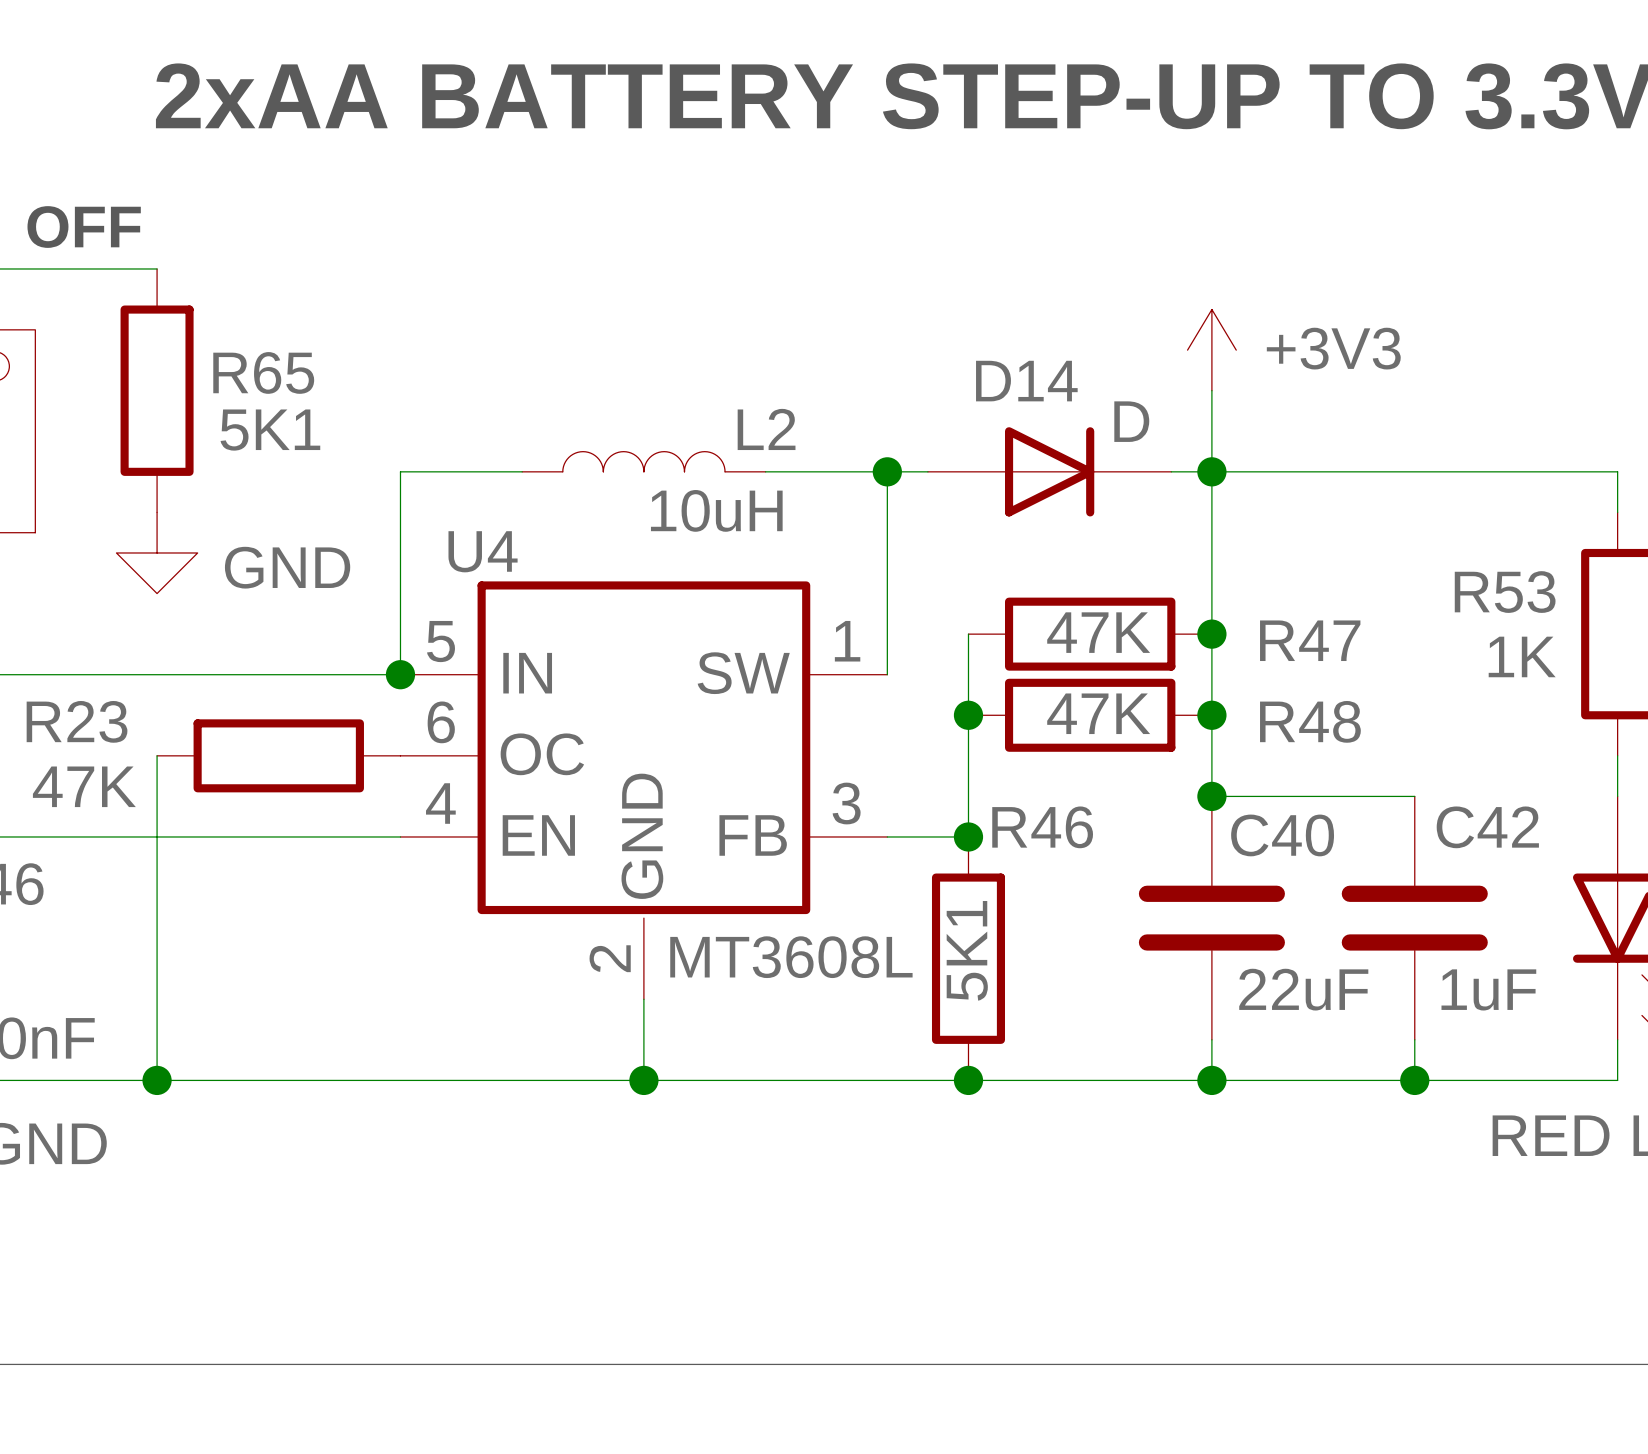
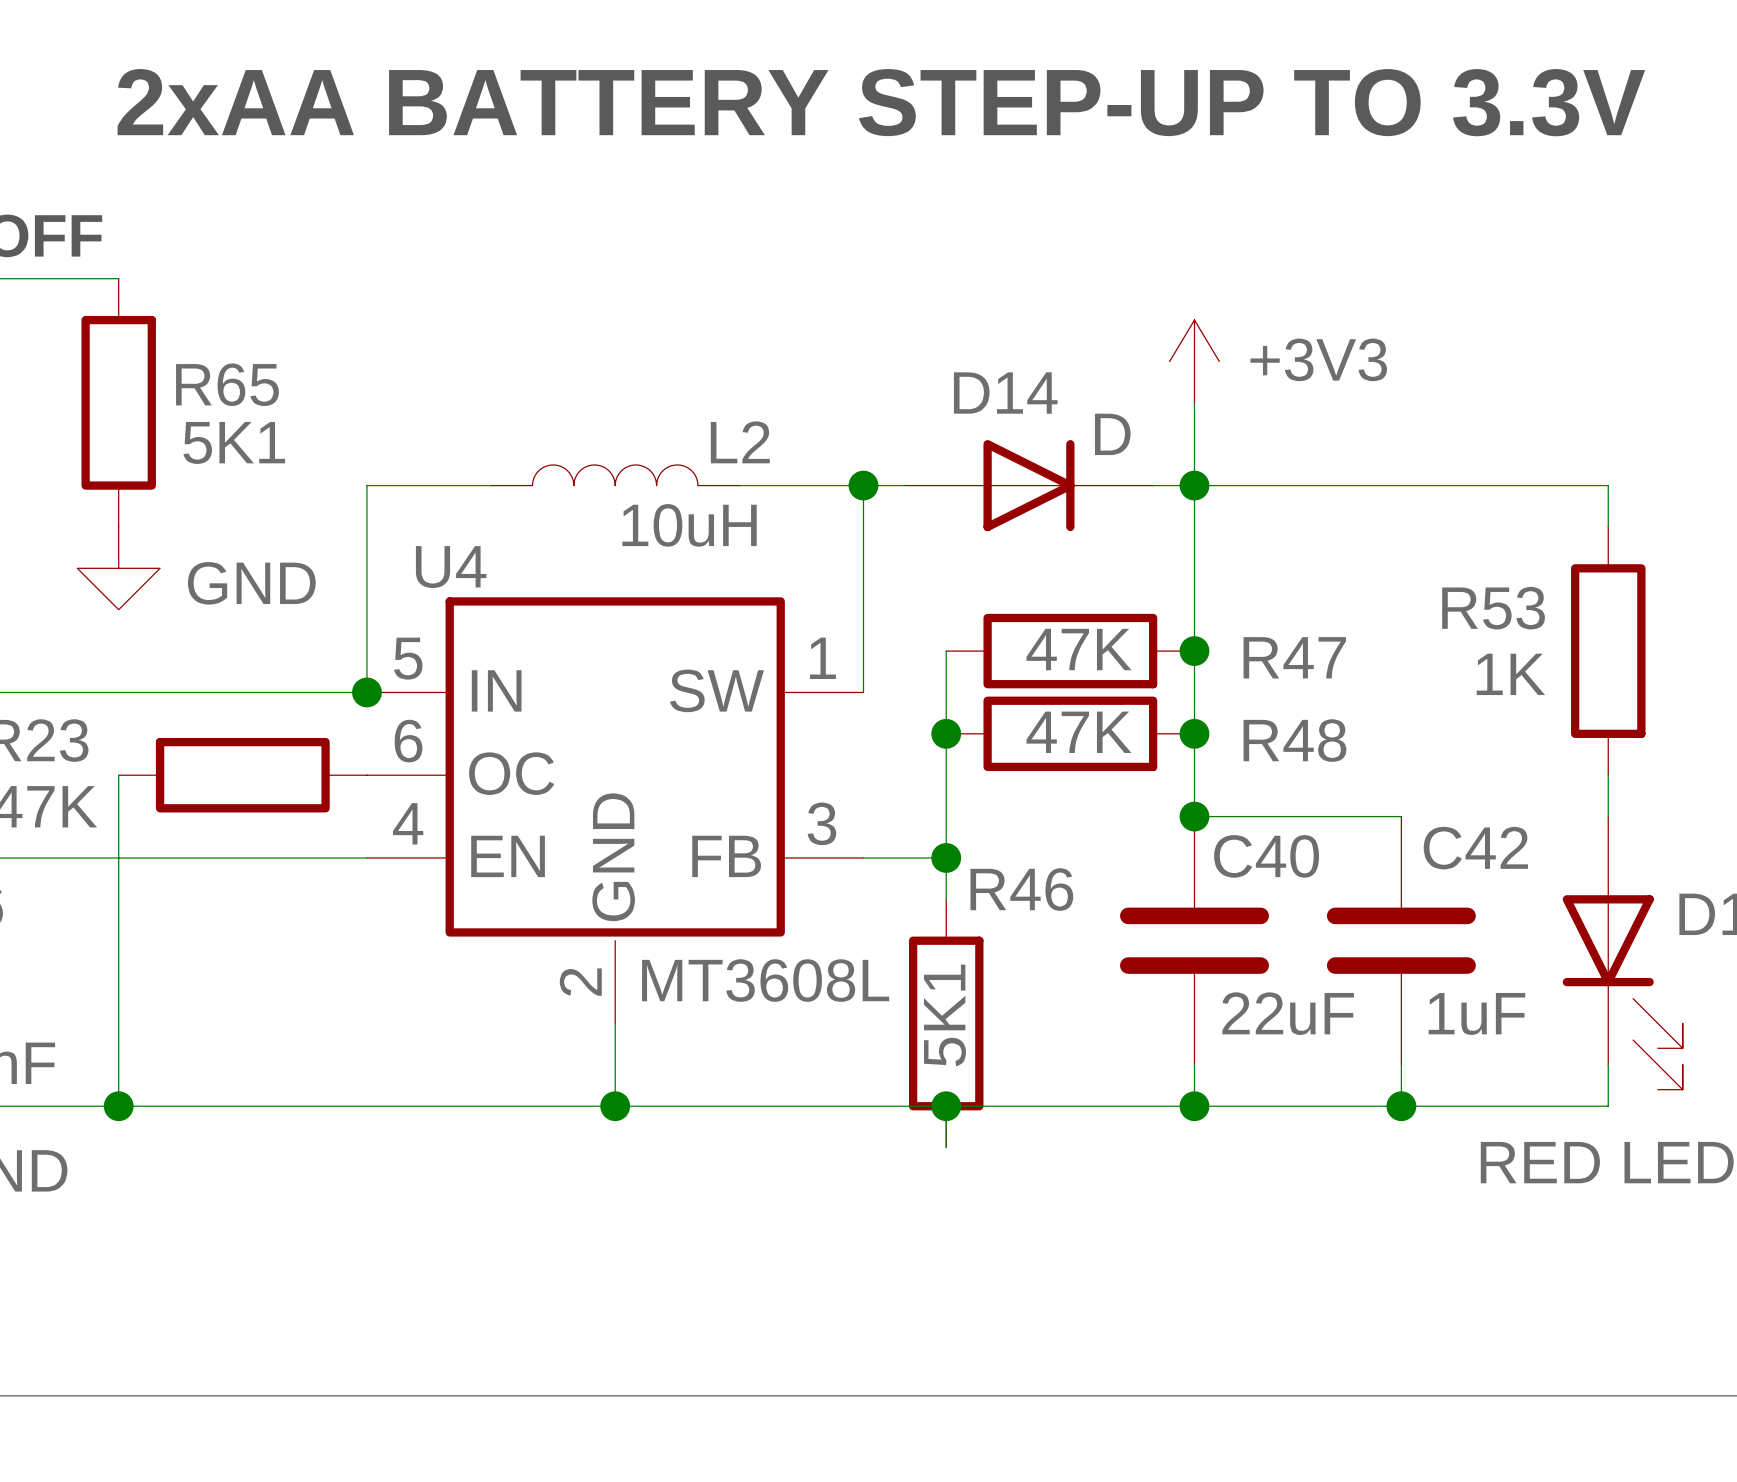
R46 position: (968, 958) -> (946, 1023)
wire: none -> (946, 1106) (946, 1147)

